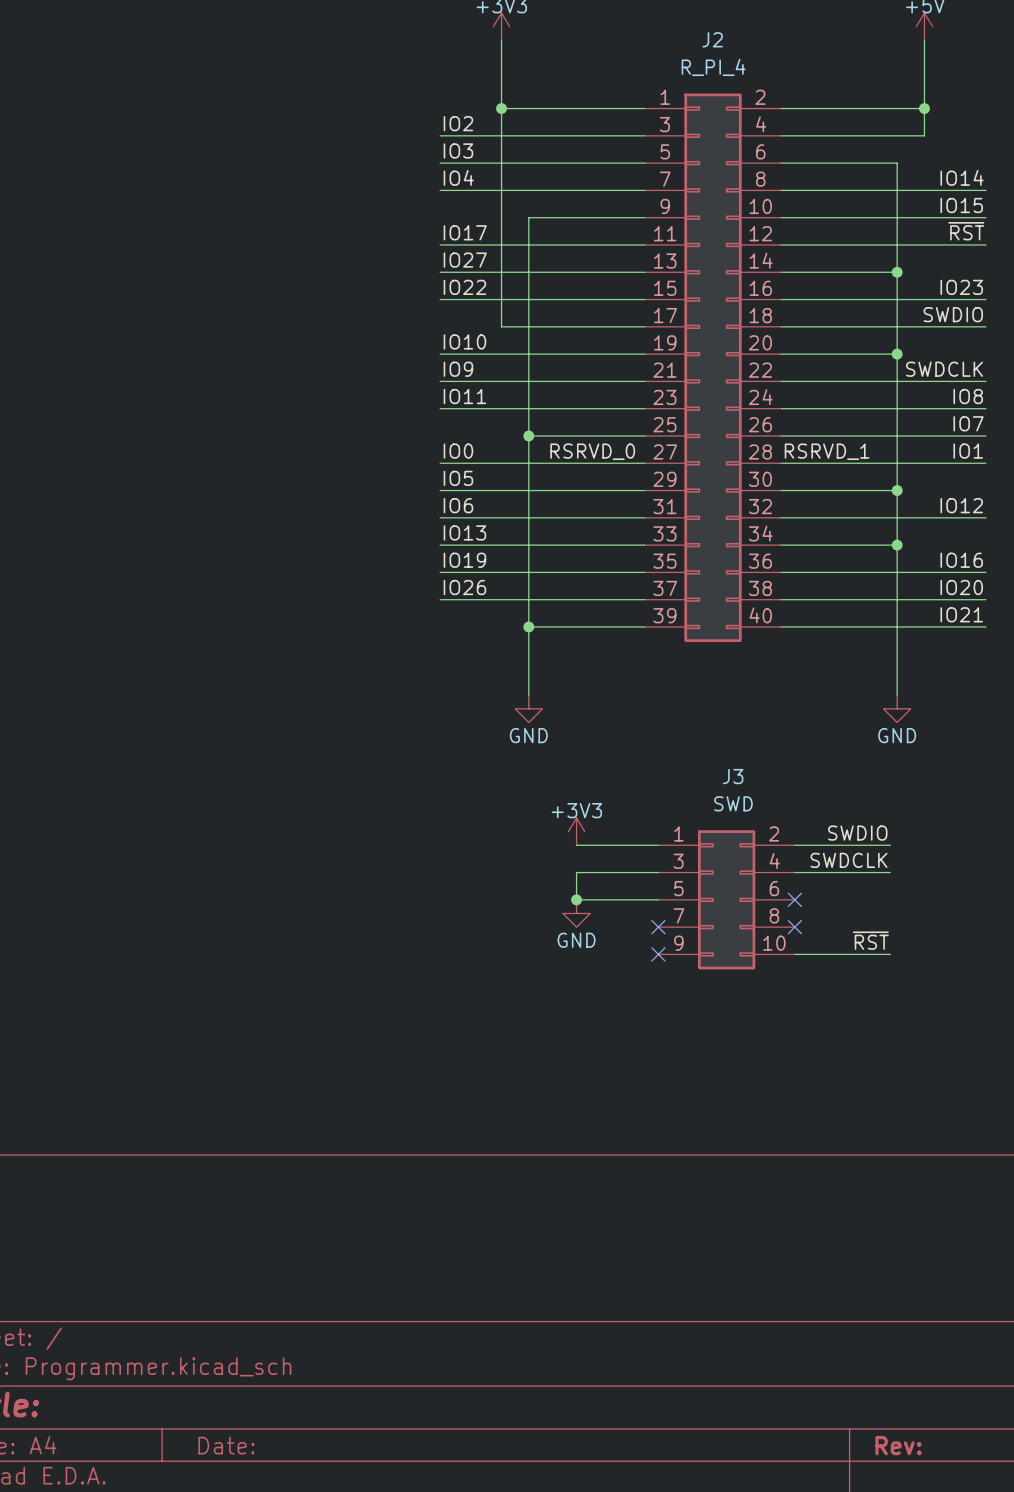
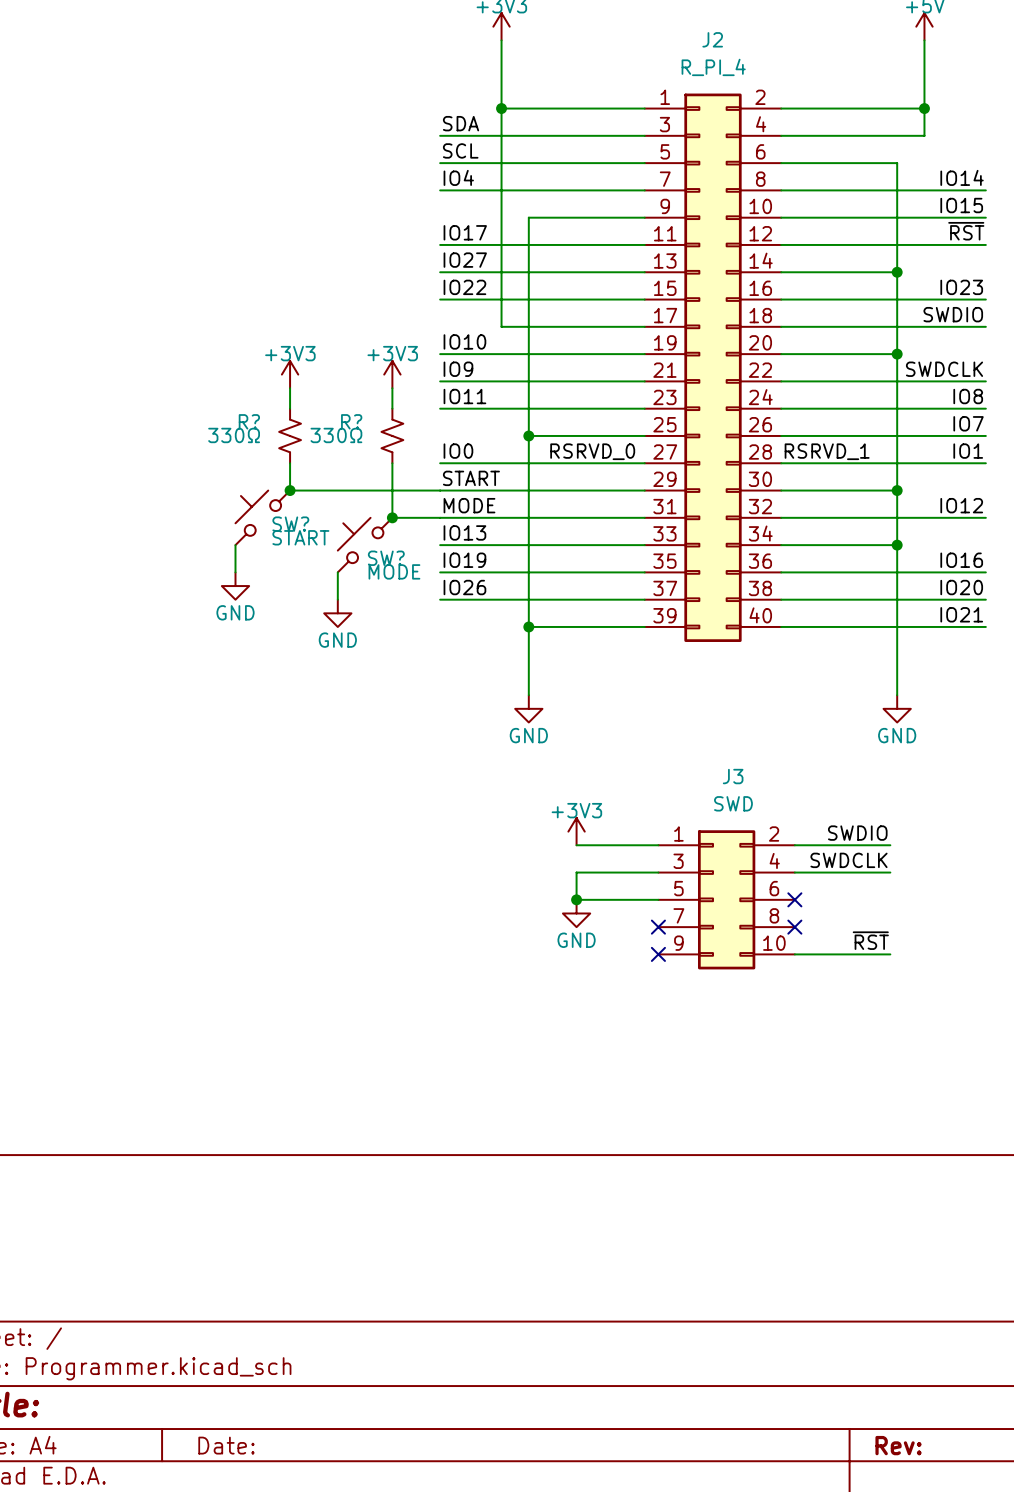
label: IO2 (458, 123) -> SDA (461, 123)
label: IO3 (458, 150) -> SCL (460, 150)
power symbol: none -> +3V3 (290, 374)
power symbol: none -> +3V3 (392, 374)
wire: none -> (290, 388) (290, 408)
wire: none -> (392, 388) (392, 408)
R?: none -> 330Ω (290, 435)
R?: none -> 330Ω (392, 435)
wire: none -> (290, 463) (290, 490) (440, 490)
wire: none -> (392, 463) (392, 517) (440, 517)
label: IO5 (458, 478) -> START (471, 478)
junction: none -> (290, 490)
label: IO6 (458, 505) -> MODE (469, 505)
SW?: none -> START (262, 517)
junction: none -> (392, 517)
wire: none -> (235, 545) (235, 572)
SW?: none -> MODE (365, 545)
wire: none -> (337, 572) (337, 599)
power symbol: none -> GND (235, 586)
power symbol: none -> GND (337, 613)

